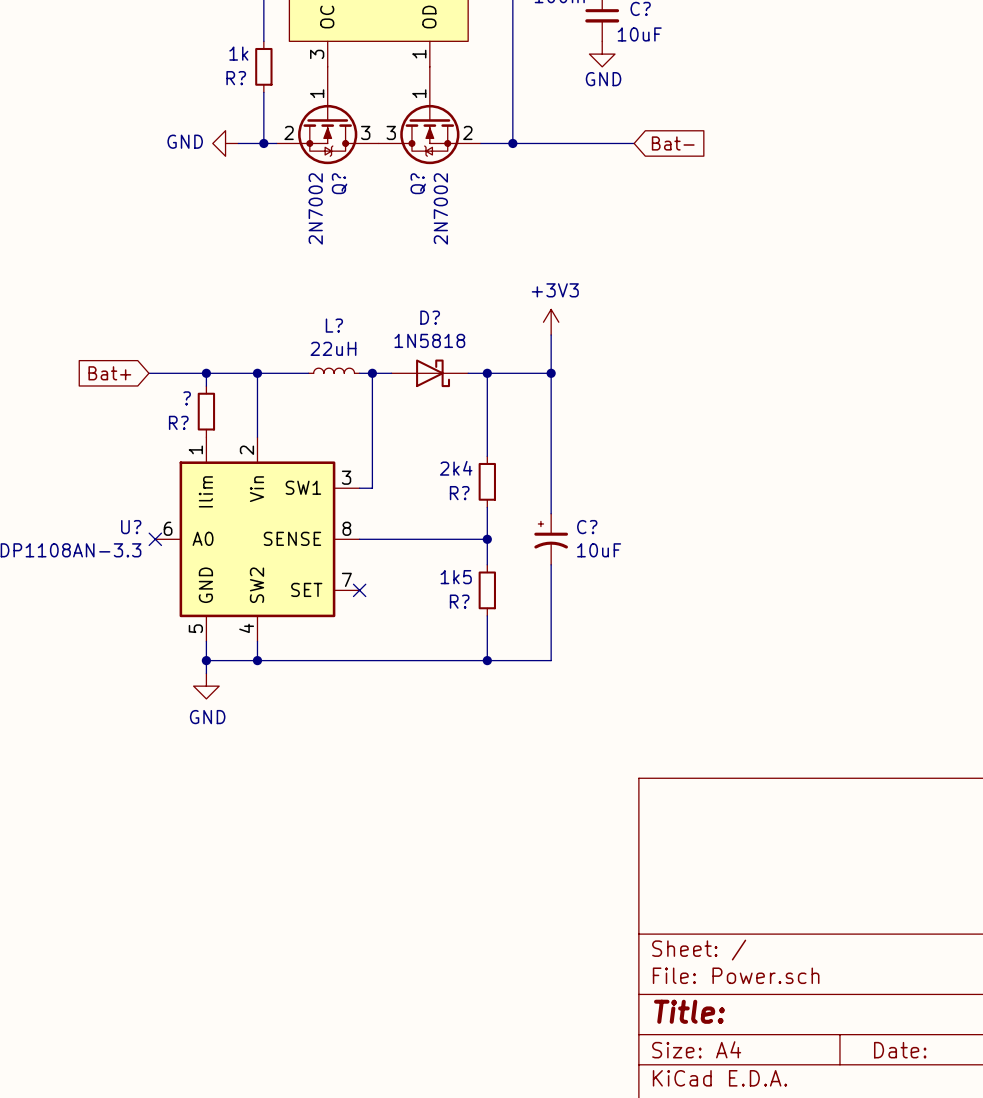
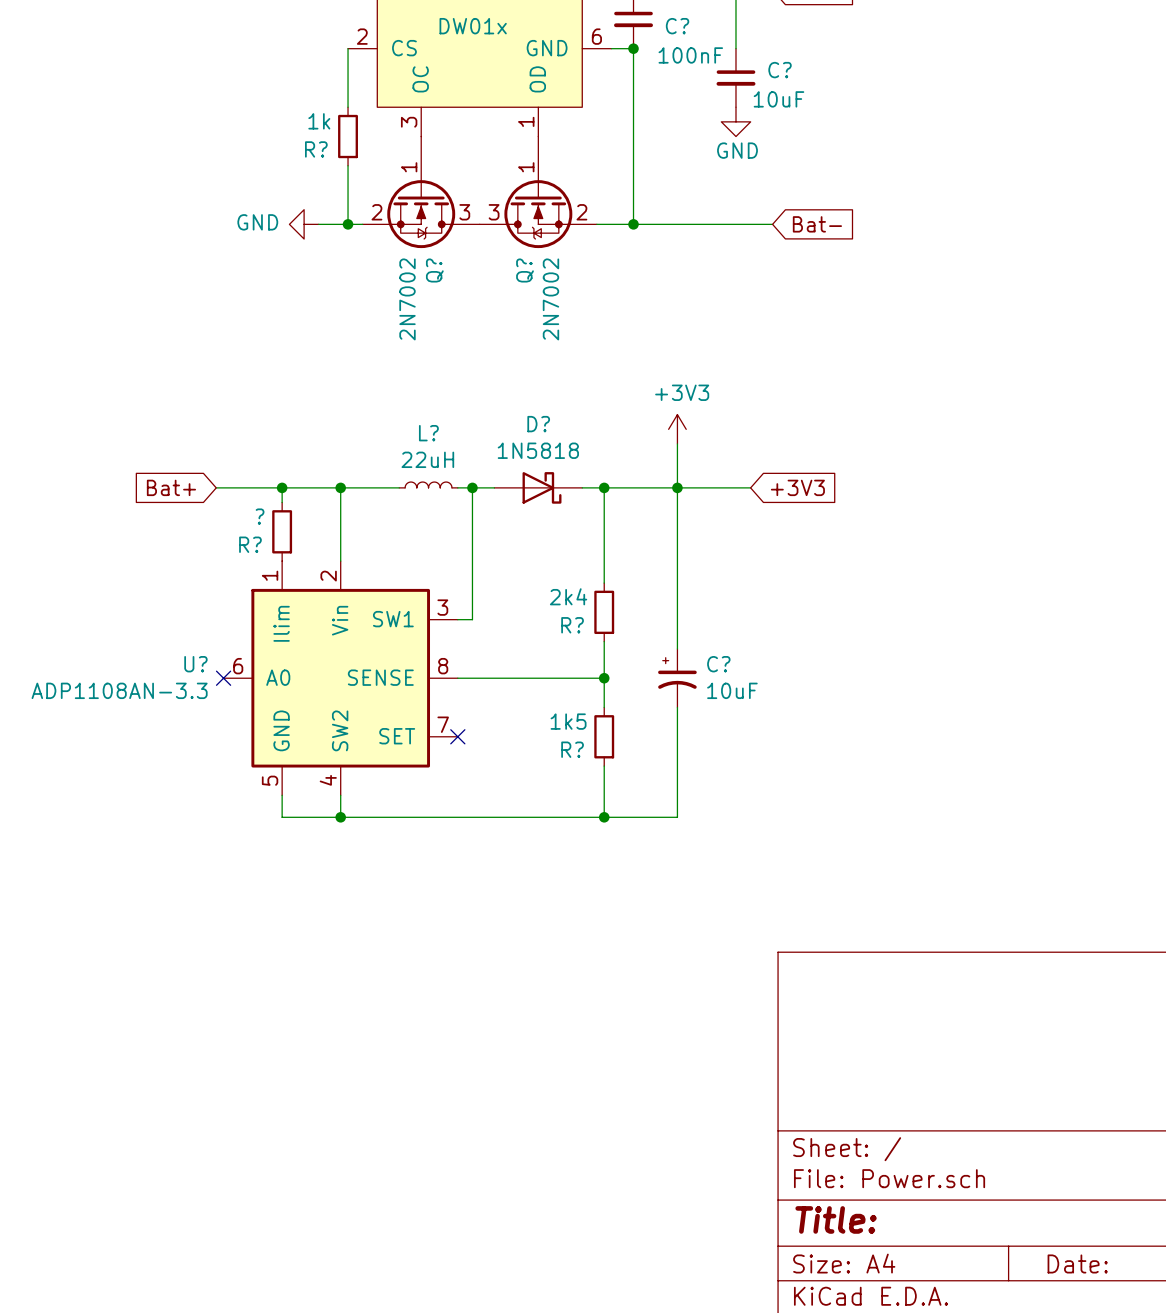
wire: none -> (677, 487) (750, 487)
global label: none -> +3V3 (797, 487)
wire: (206, 660) (206, 673) -> none
junction: (206, 660) -> none
power symbol: GND (206, 686) -> none

